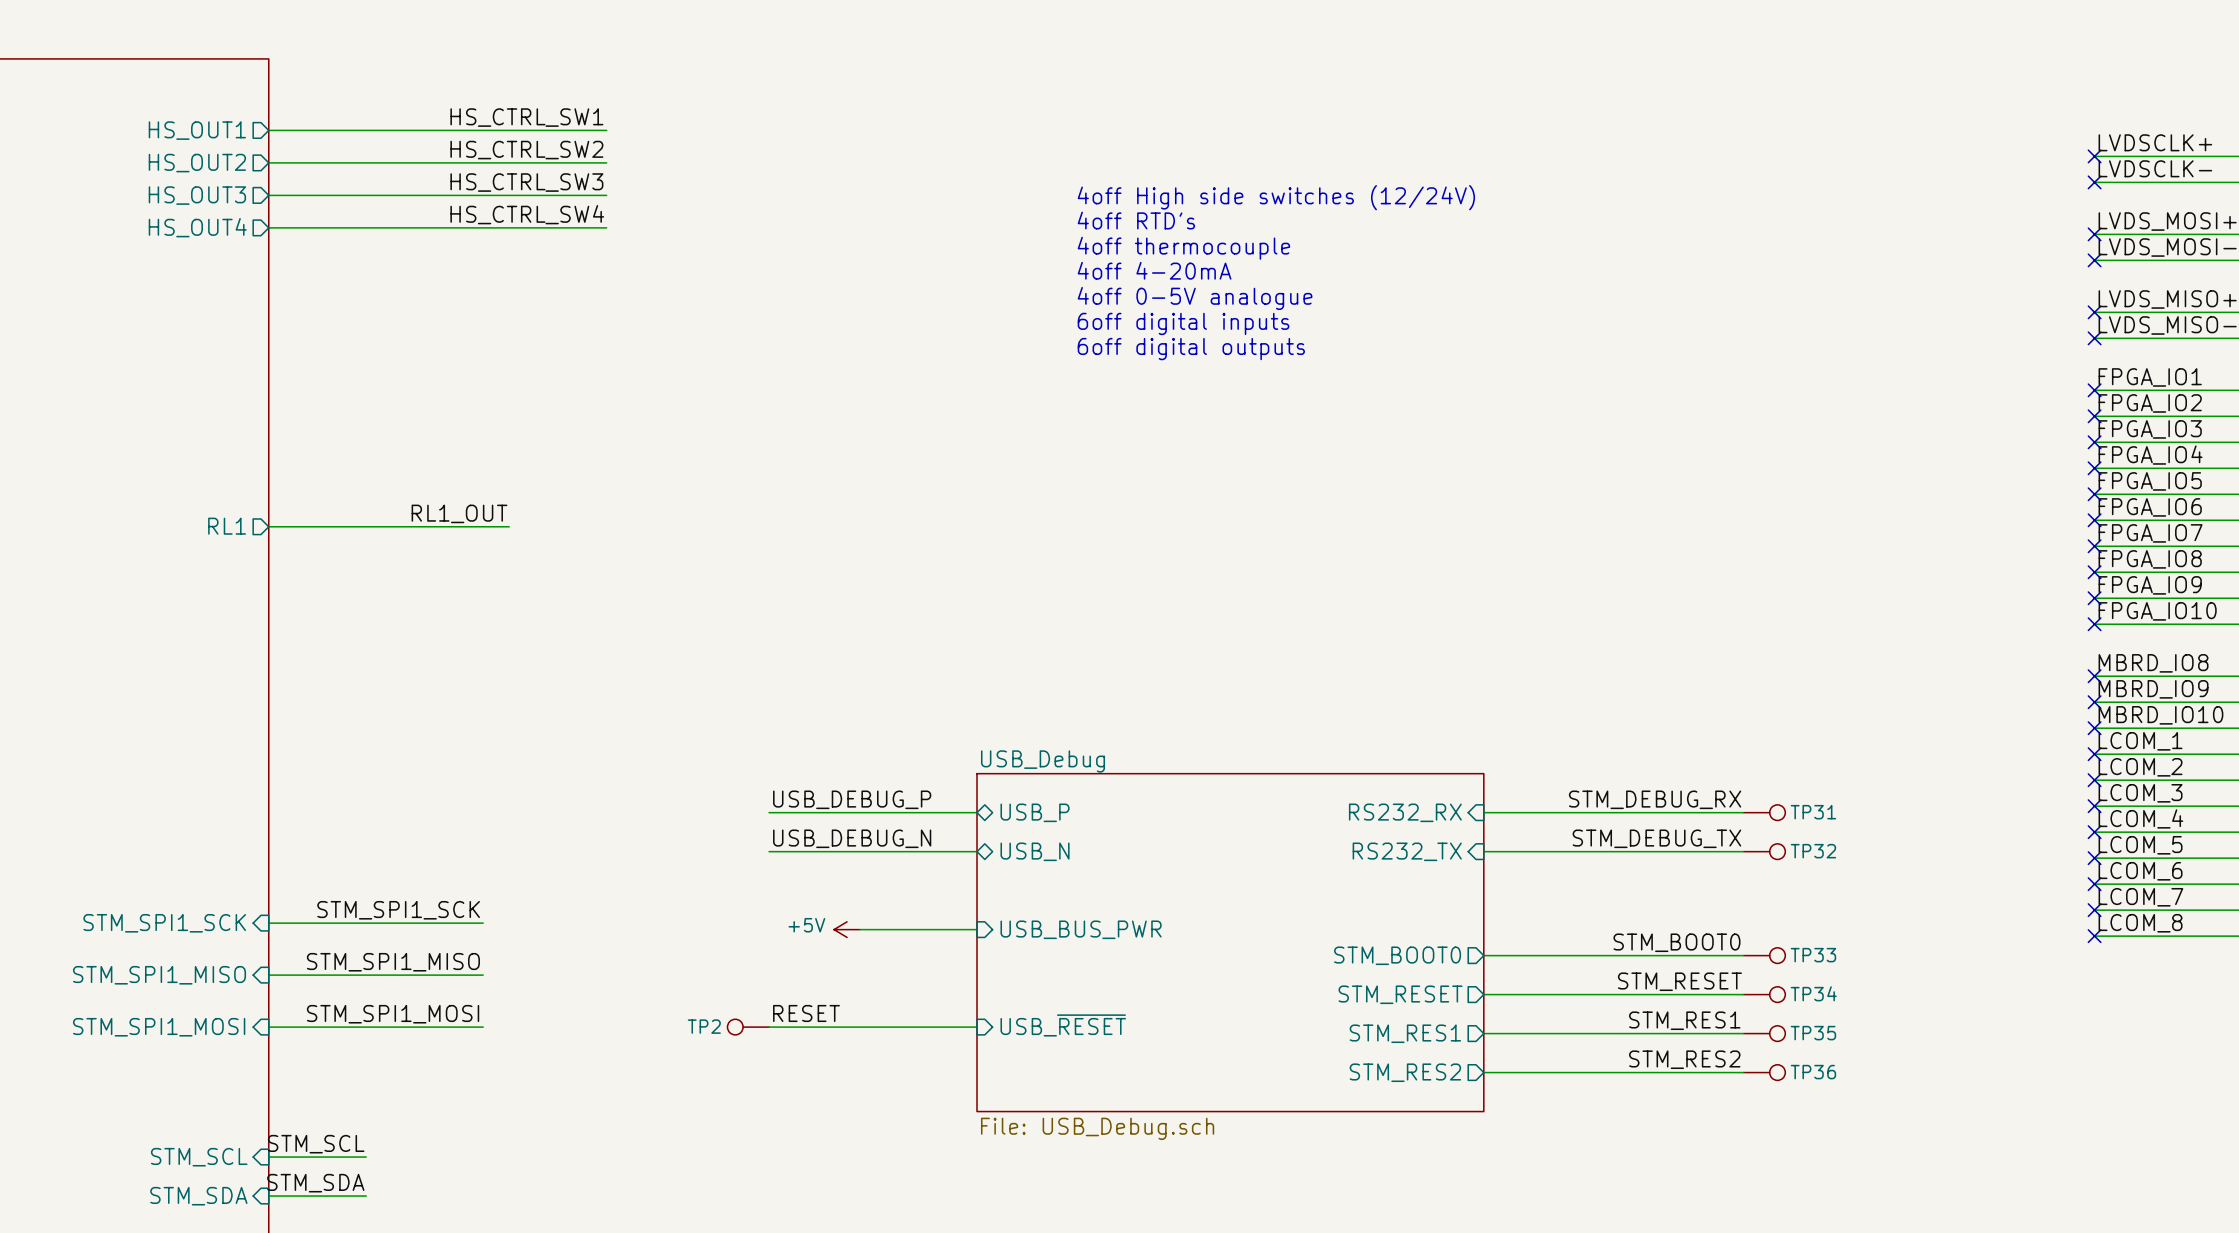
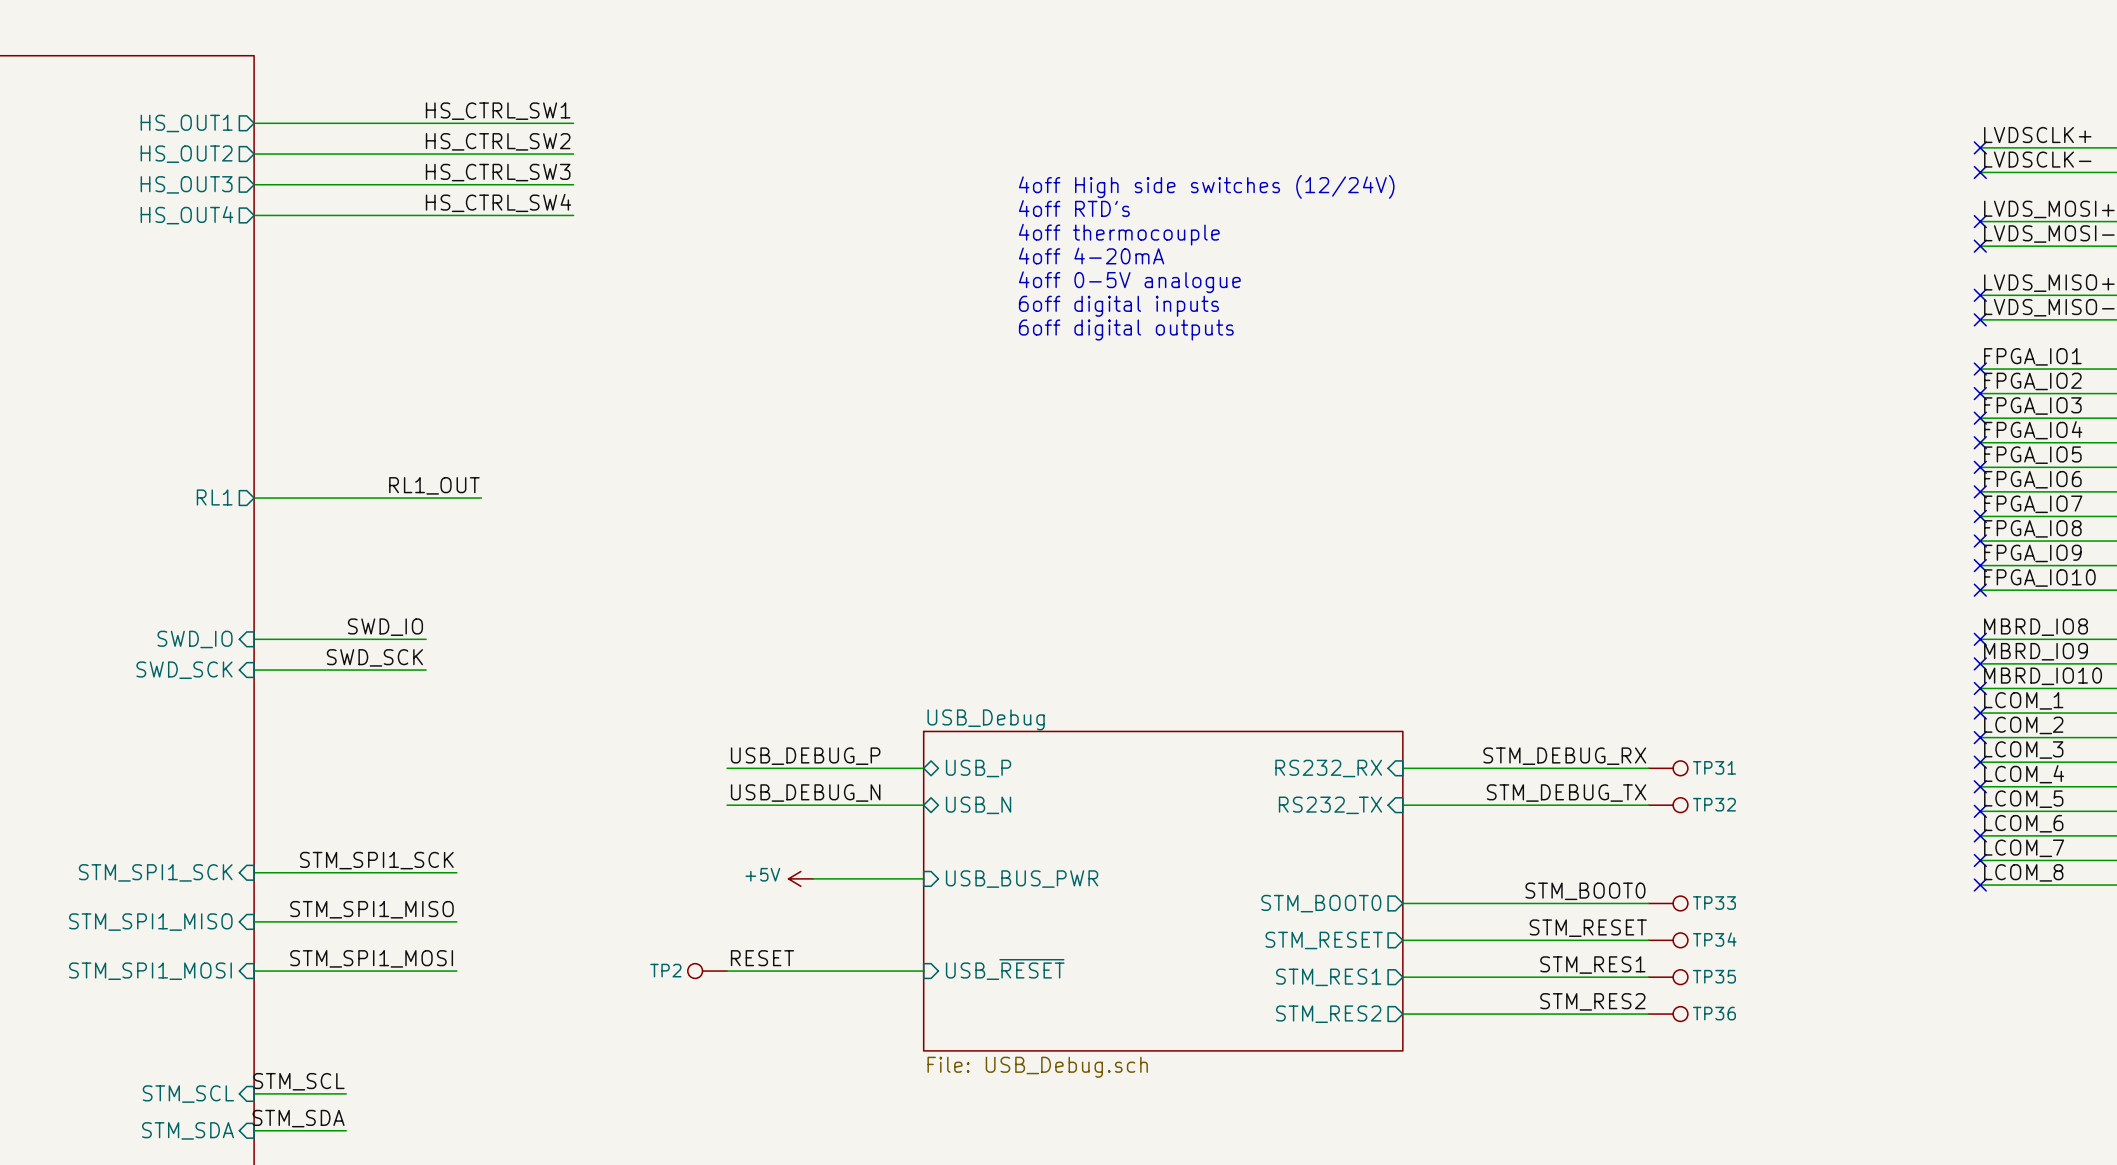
label: none -> SWD_IO (385, 627)
sheet pin: none -> SWD_IO (195, 639)
wire: none -> (254, 639) (426, 639)
label: none -> SWD_SCK (374, 657)
sheet pin: none -> SWD_SCK (184, 670)
wire: none -> (254, 670) (426, 670)

